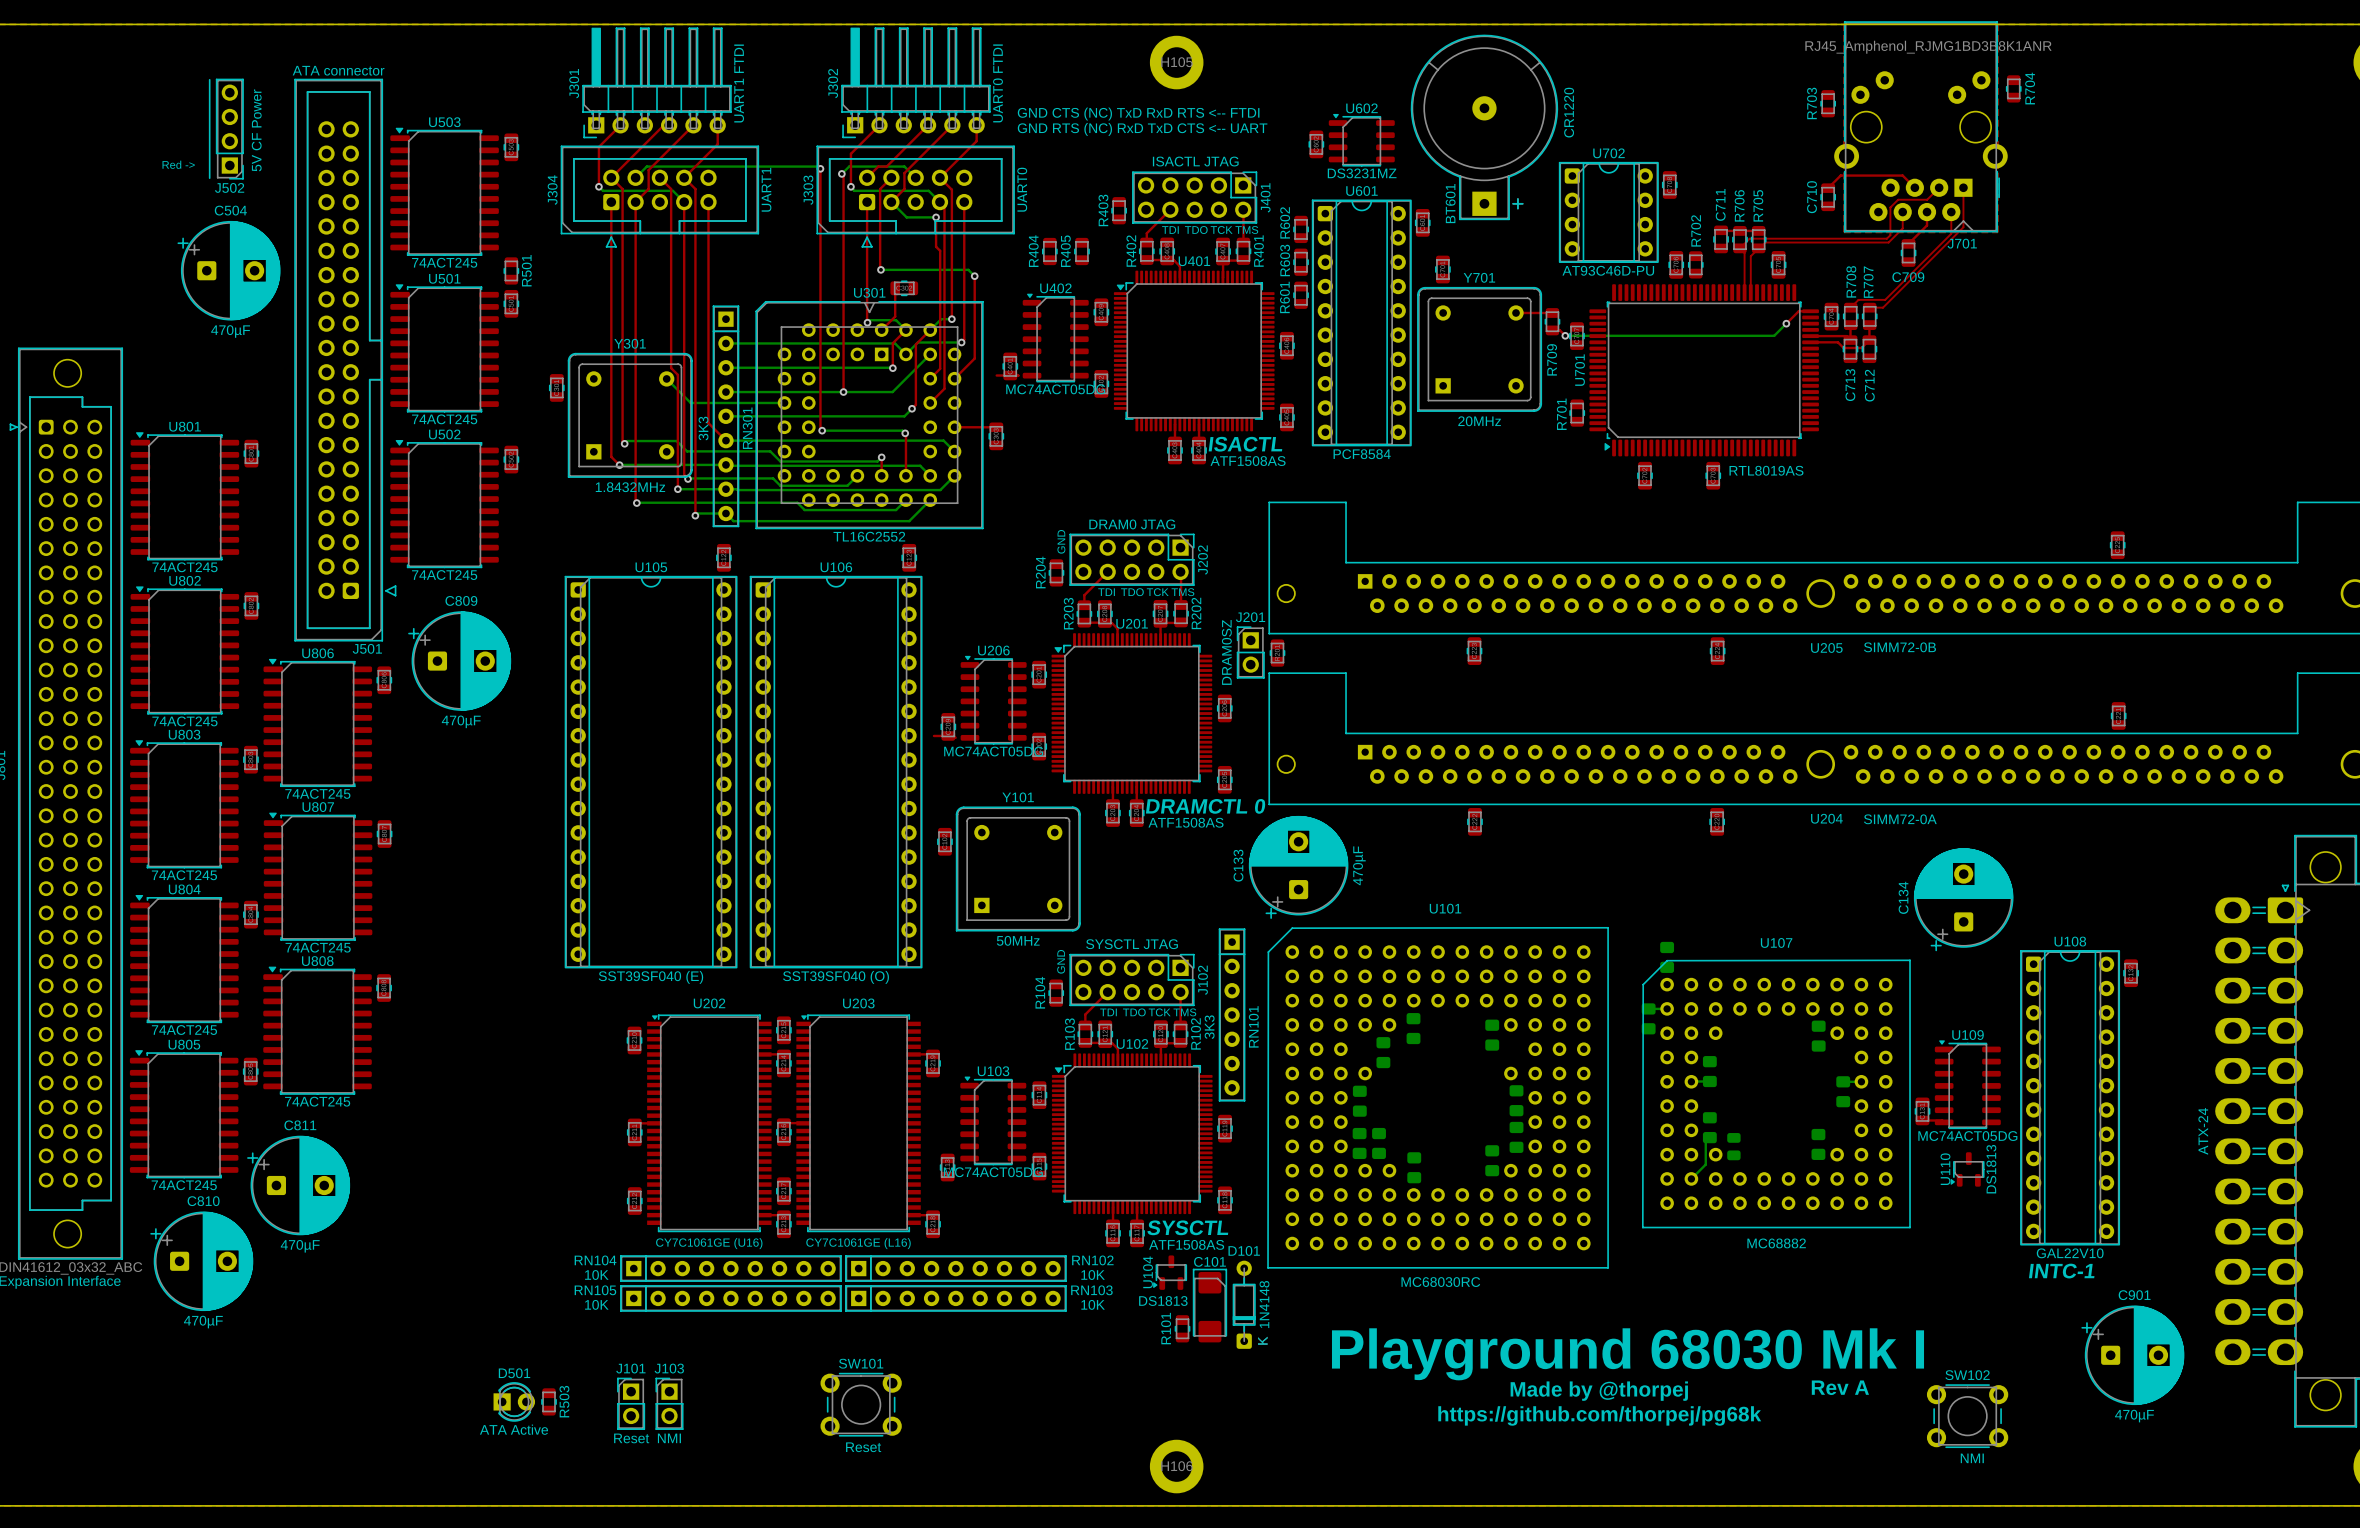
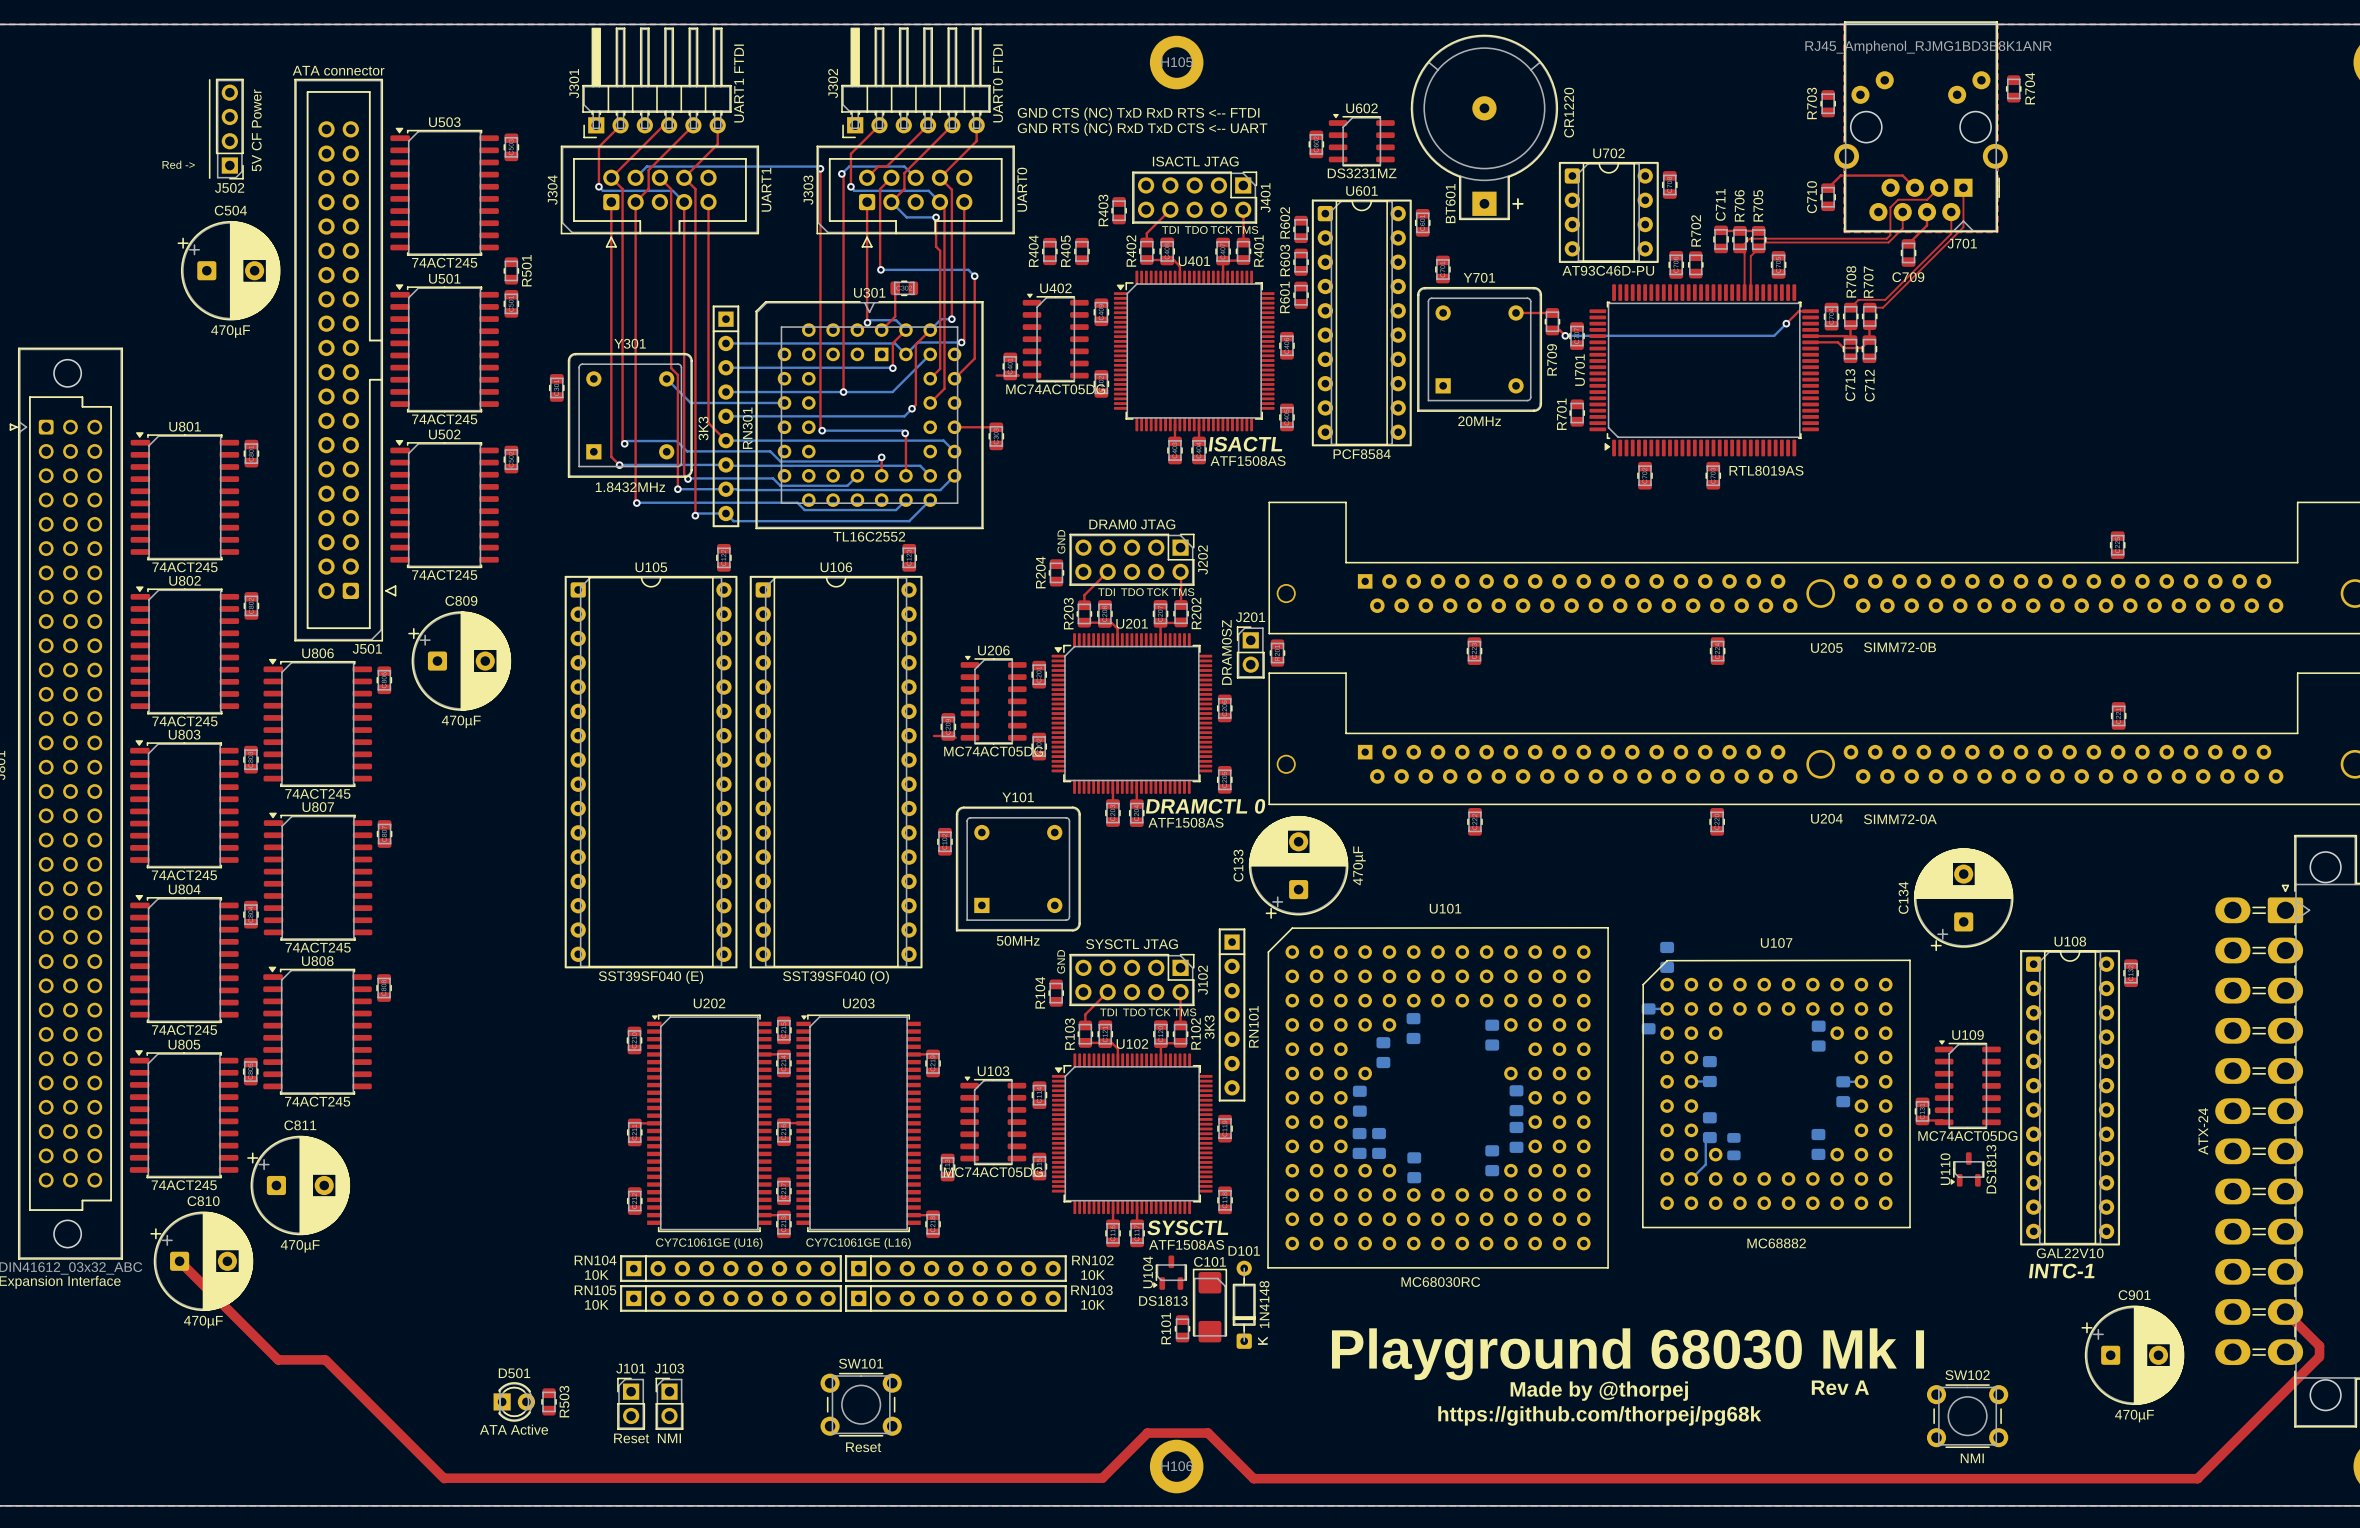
top track: none -> (179, 1261) (278, 1359) (324, 1359)
top track: none -> (2285, 1311) (2319, 1346) (2319, 1356)
top track: none -> (2318, 1357) (2197, 1478) (1253, 1478) (1208, 1433) (1147, 1433) (1102, 1478) (444, 1478)
top track: none -> (325, 1359) (444, 1478)

